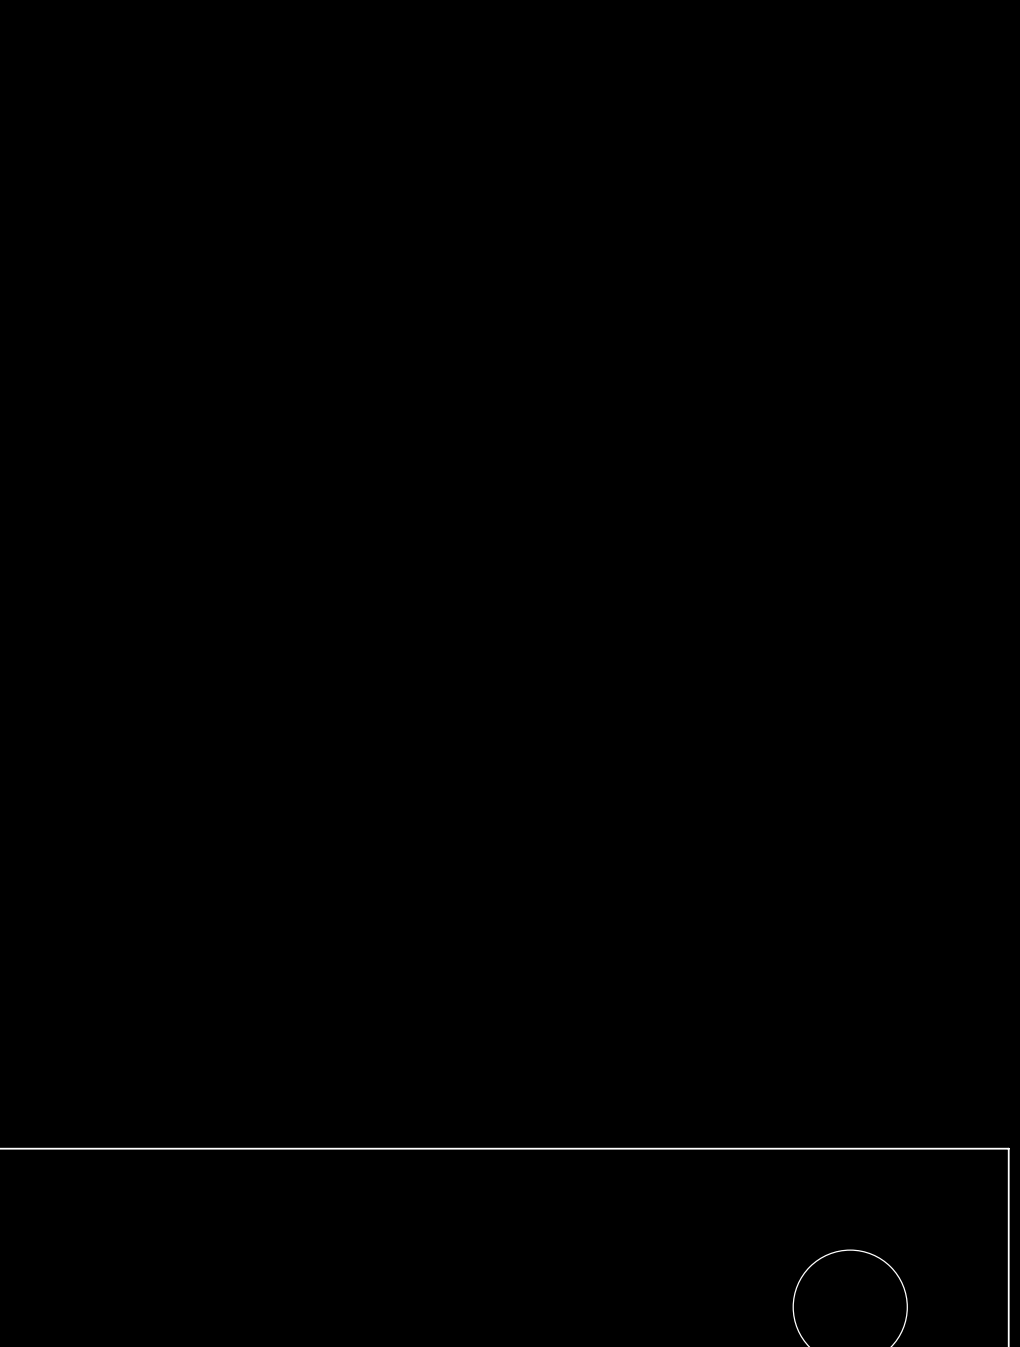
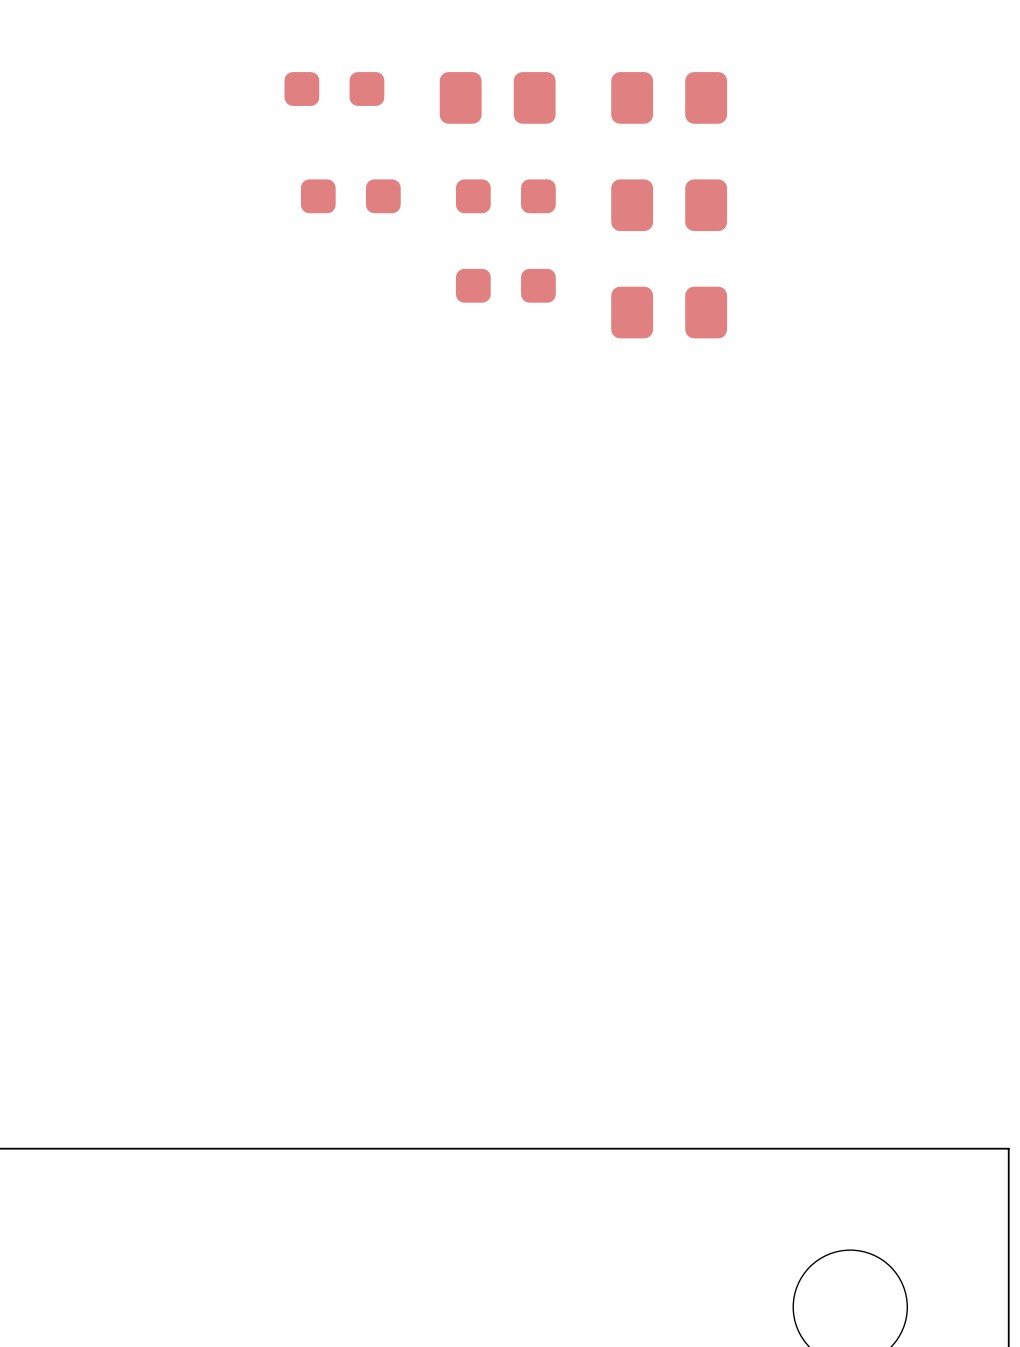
part: none -> (334, 89)
part: none -> (497, 97)
part: none -> (669, 97)
part: none -> (350, 196)
part: none -> (505, 196)
part: none -> (669, 205)
part: none -> (505, 285)
part: none -> (669, 312)

